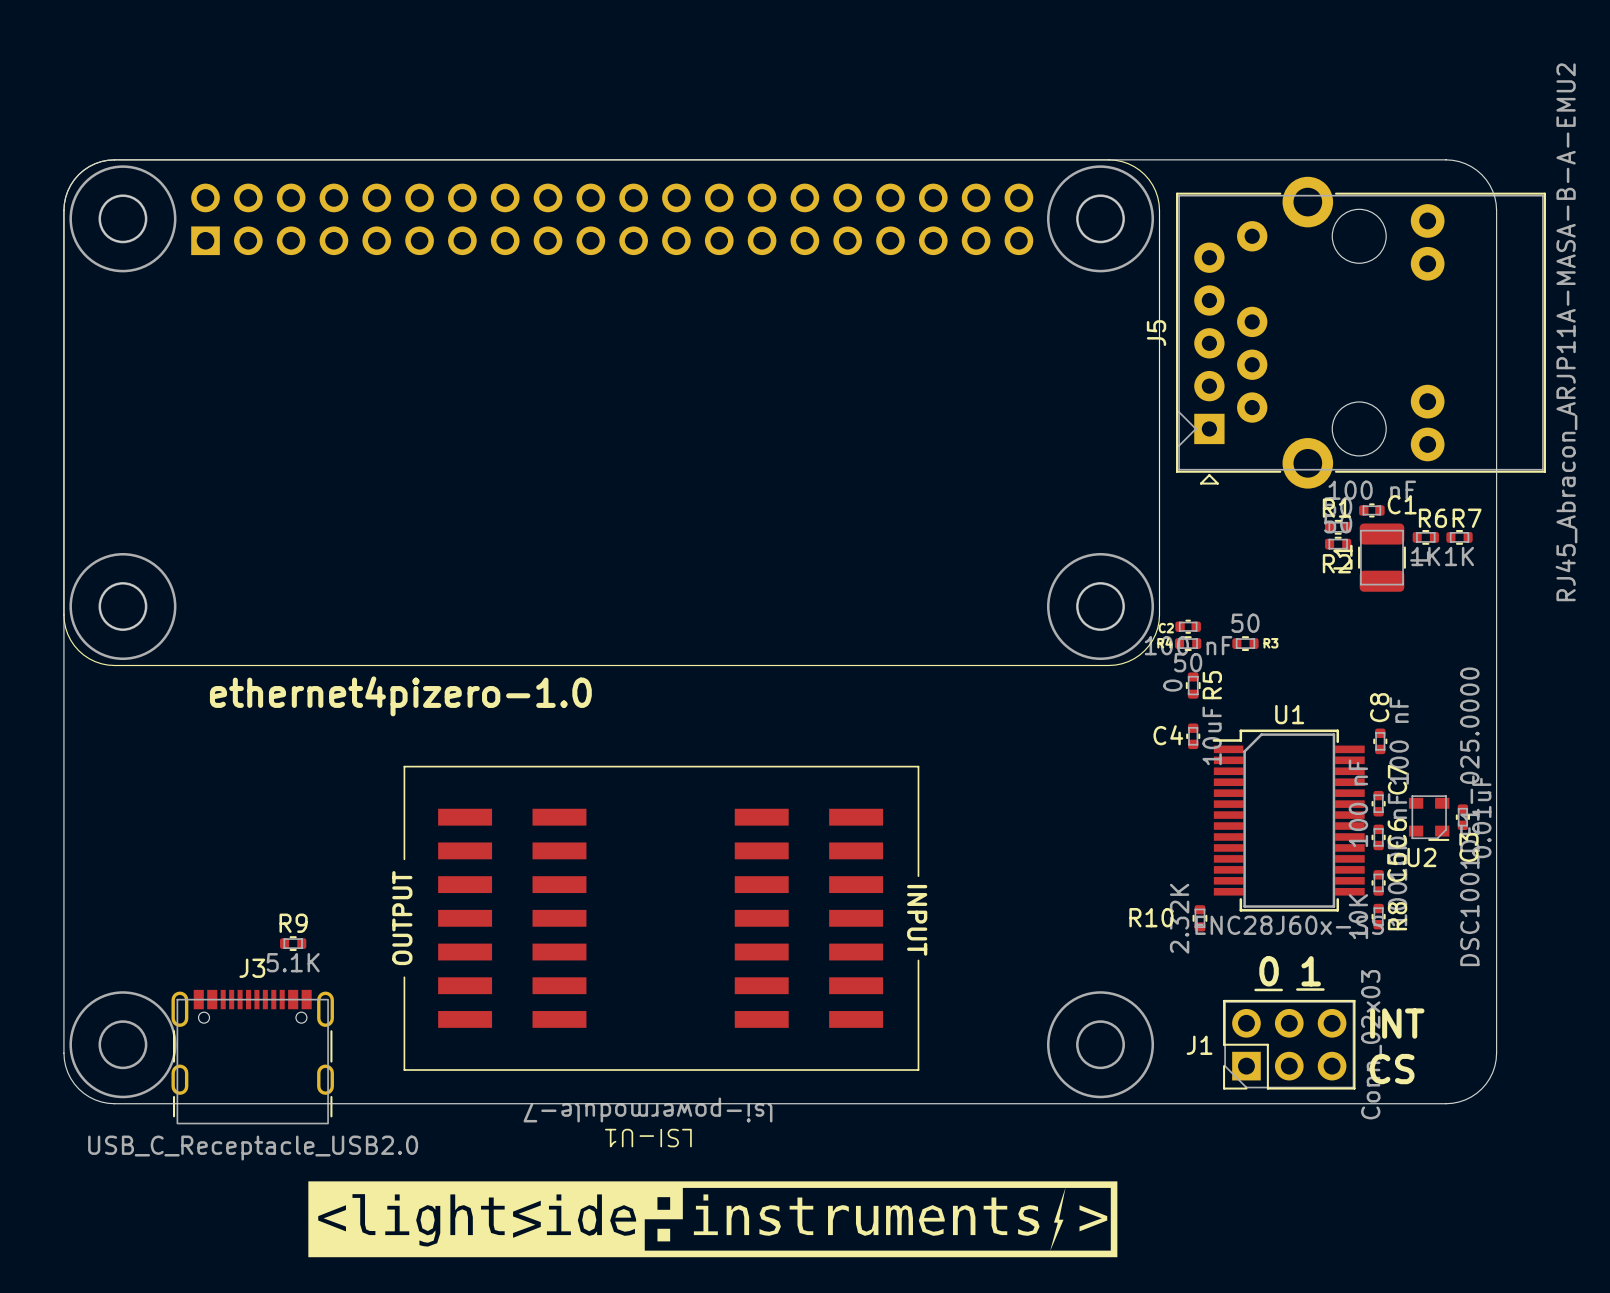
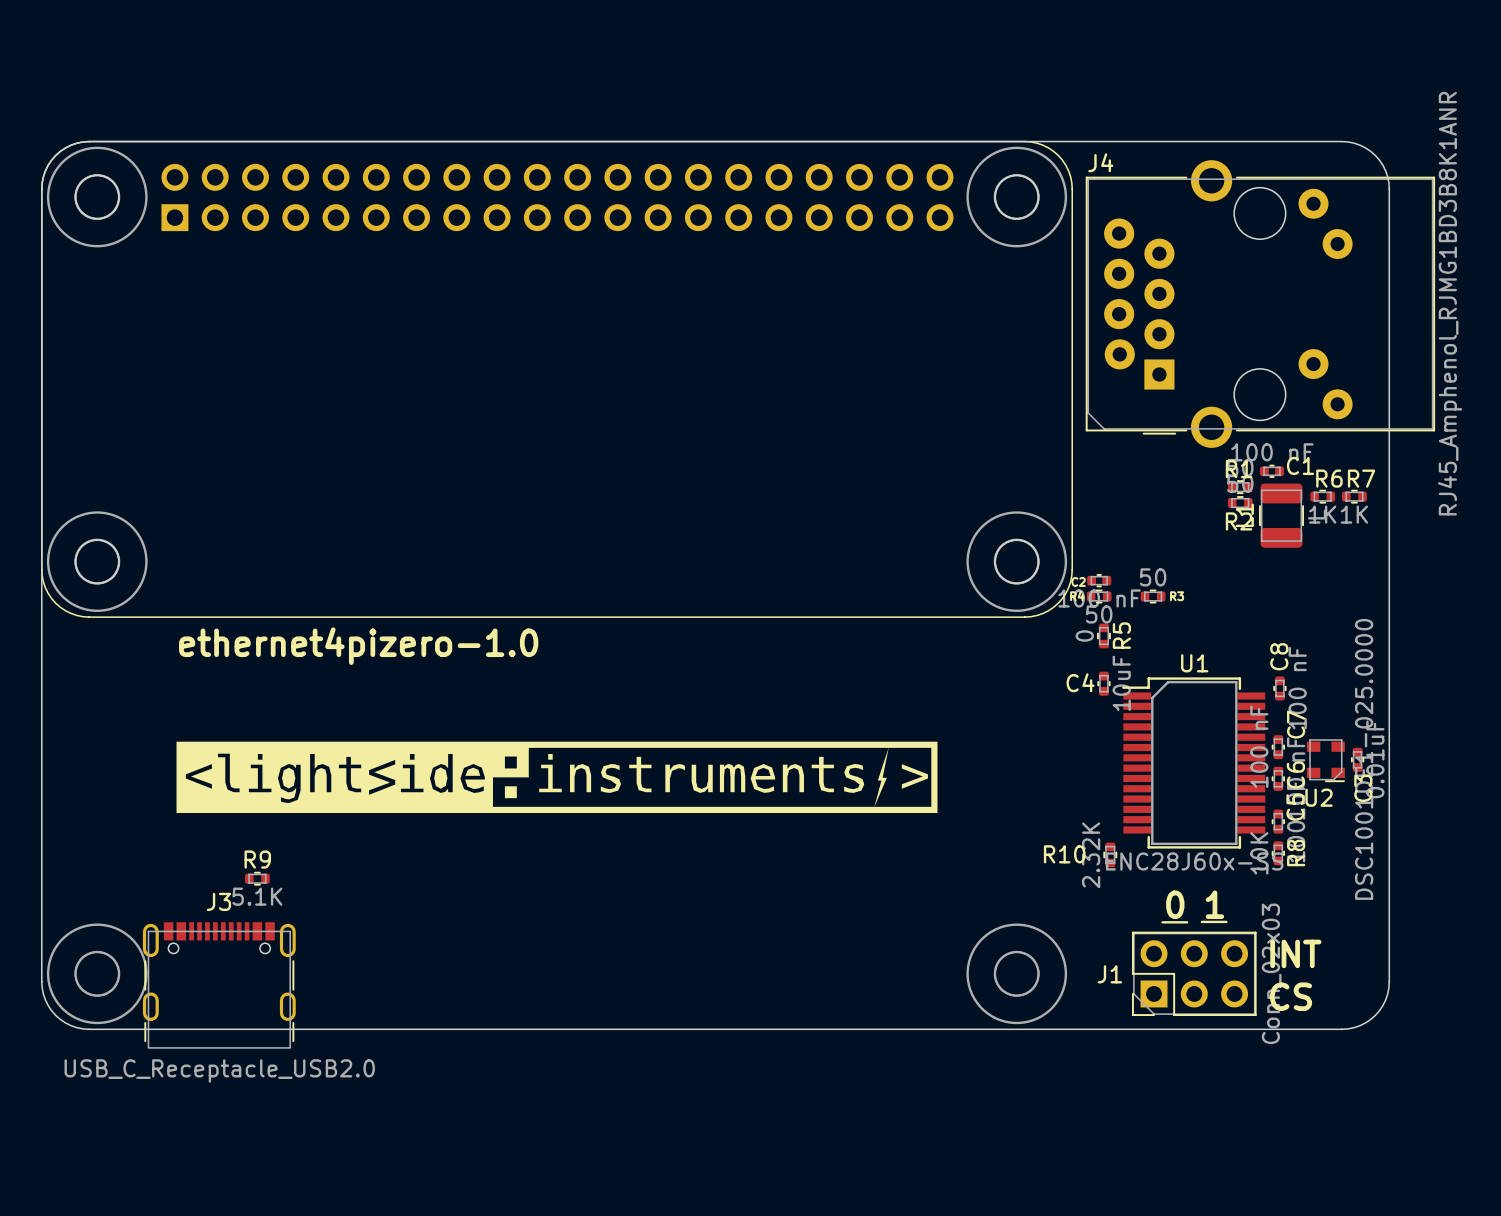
J4: none -> RJ45_Amphenol_RJMG1BD3B8K1ANR (1260, 304)
J5: RJ45_Abracon_ARJP11A-MASA-B-A-EMU2 (1361, 332) -> none
LSI-U1: lsi-powermodule-7 (661, 918) -> none
drawing position: (712, 1219) -> (557, 777)

